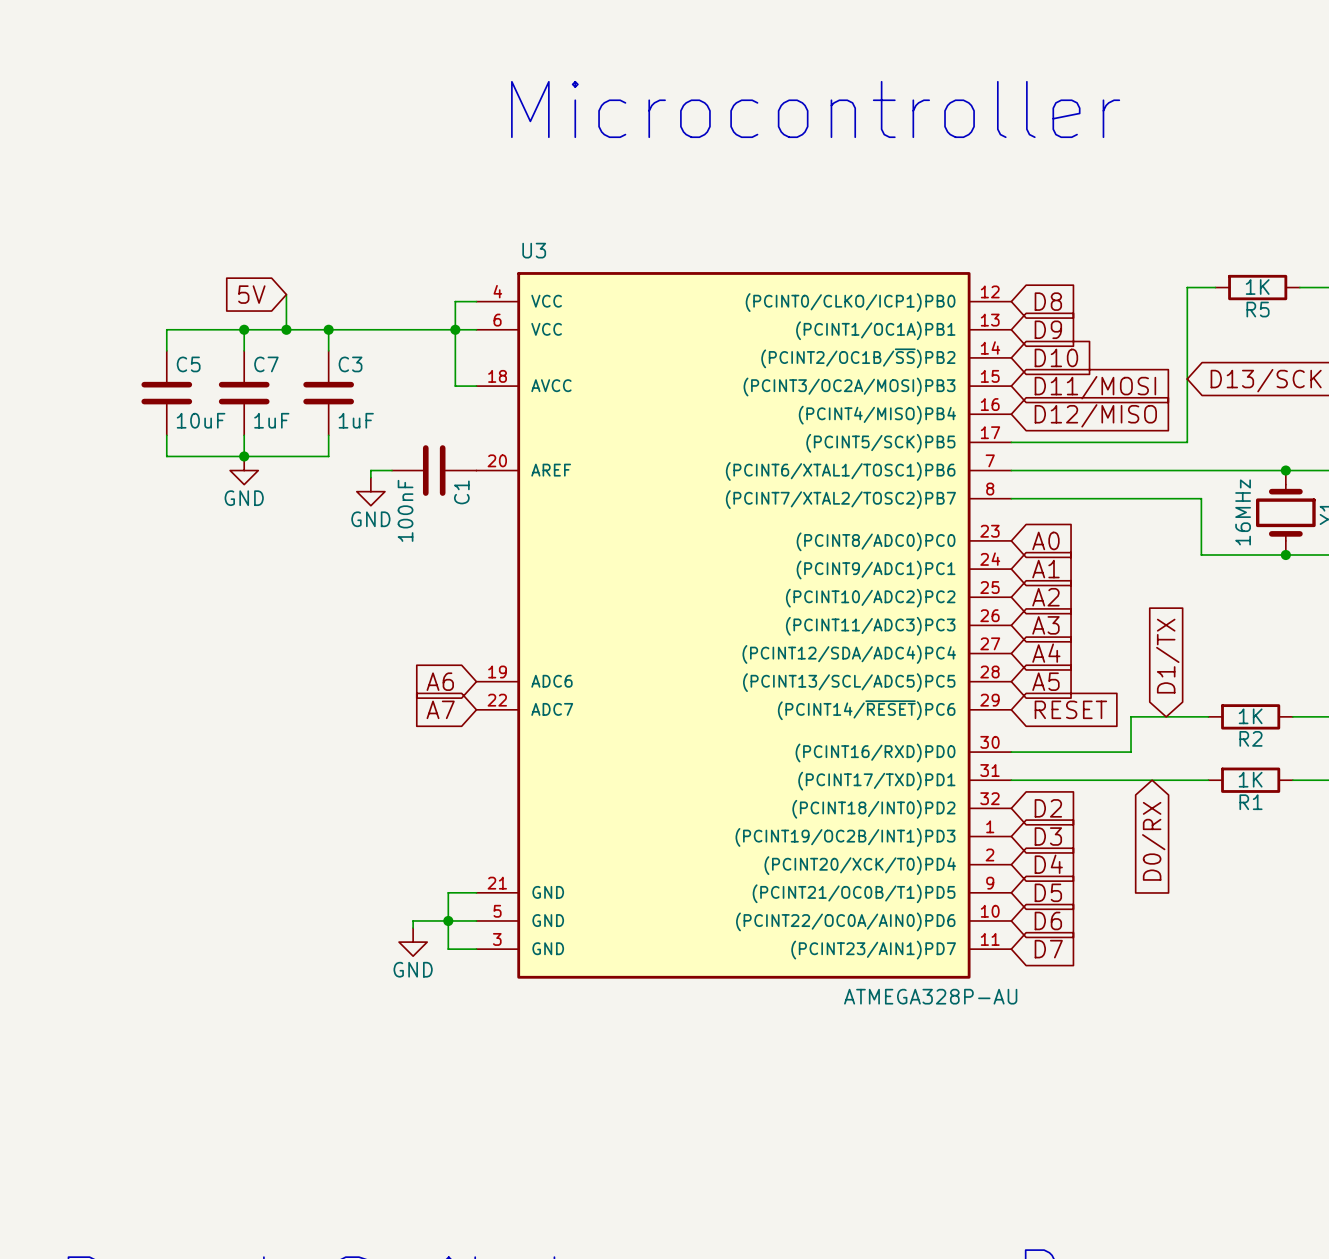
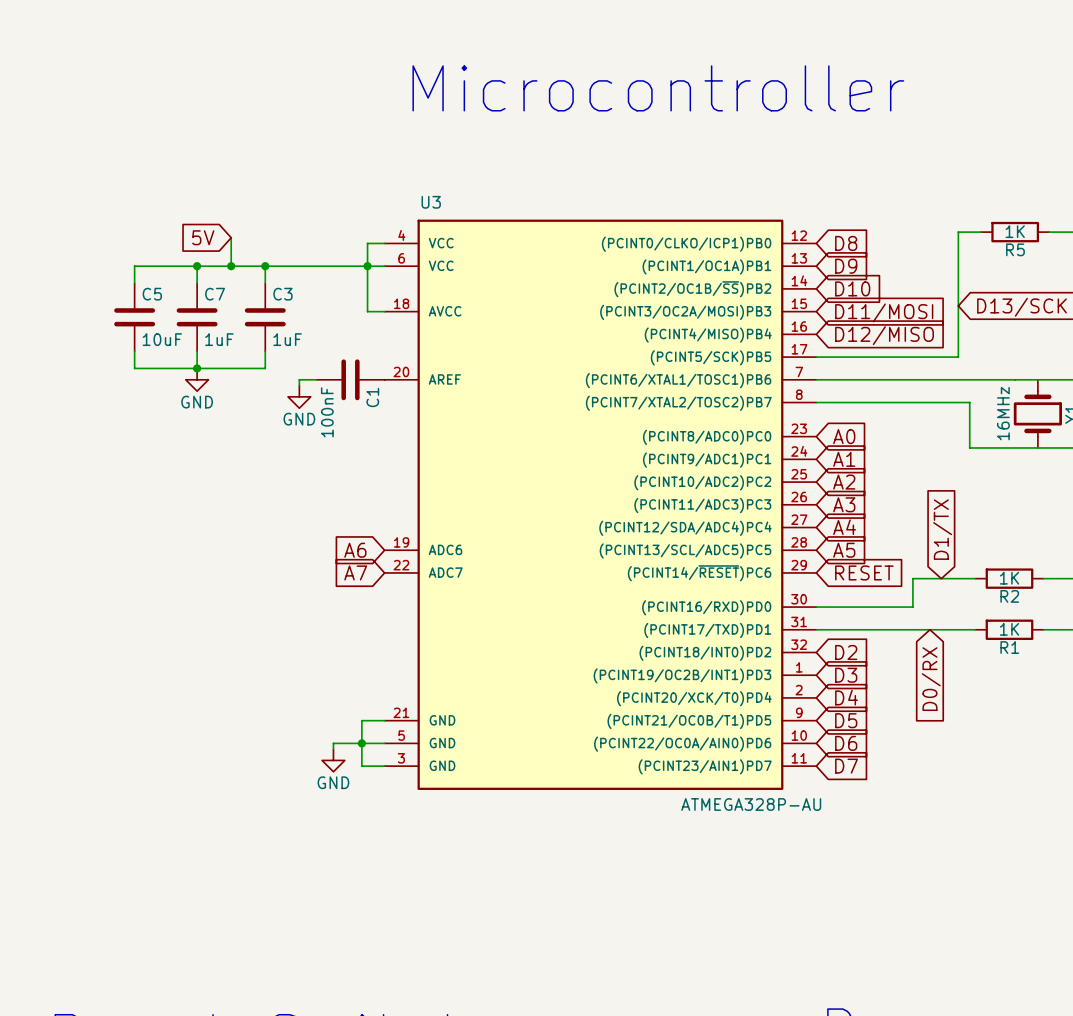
junction: (1285, 470) -> none
junction: (1285, 555) -> none

